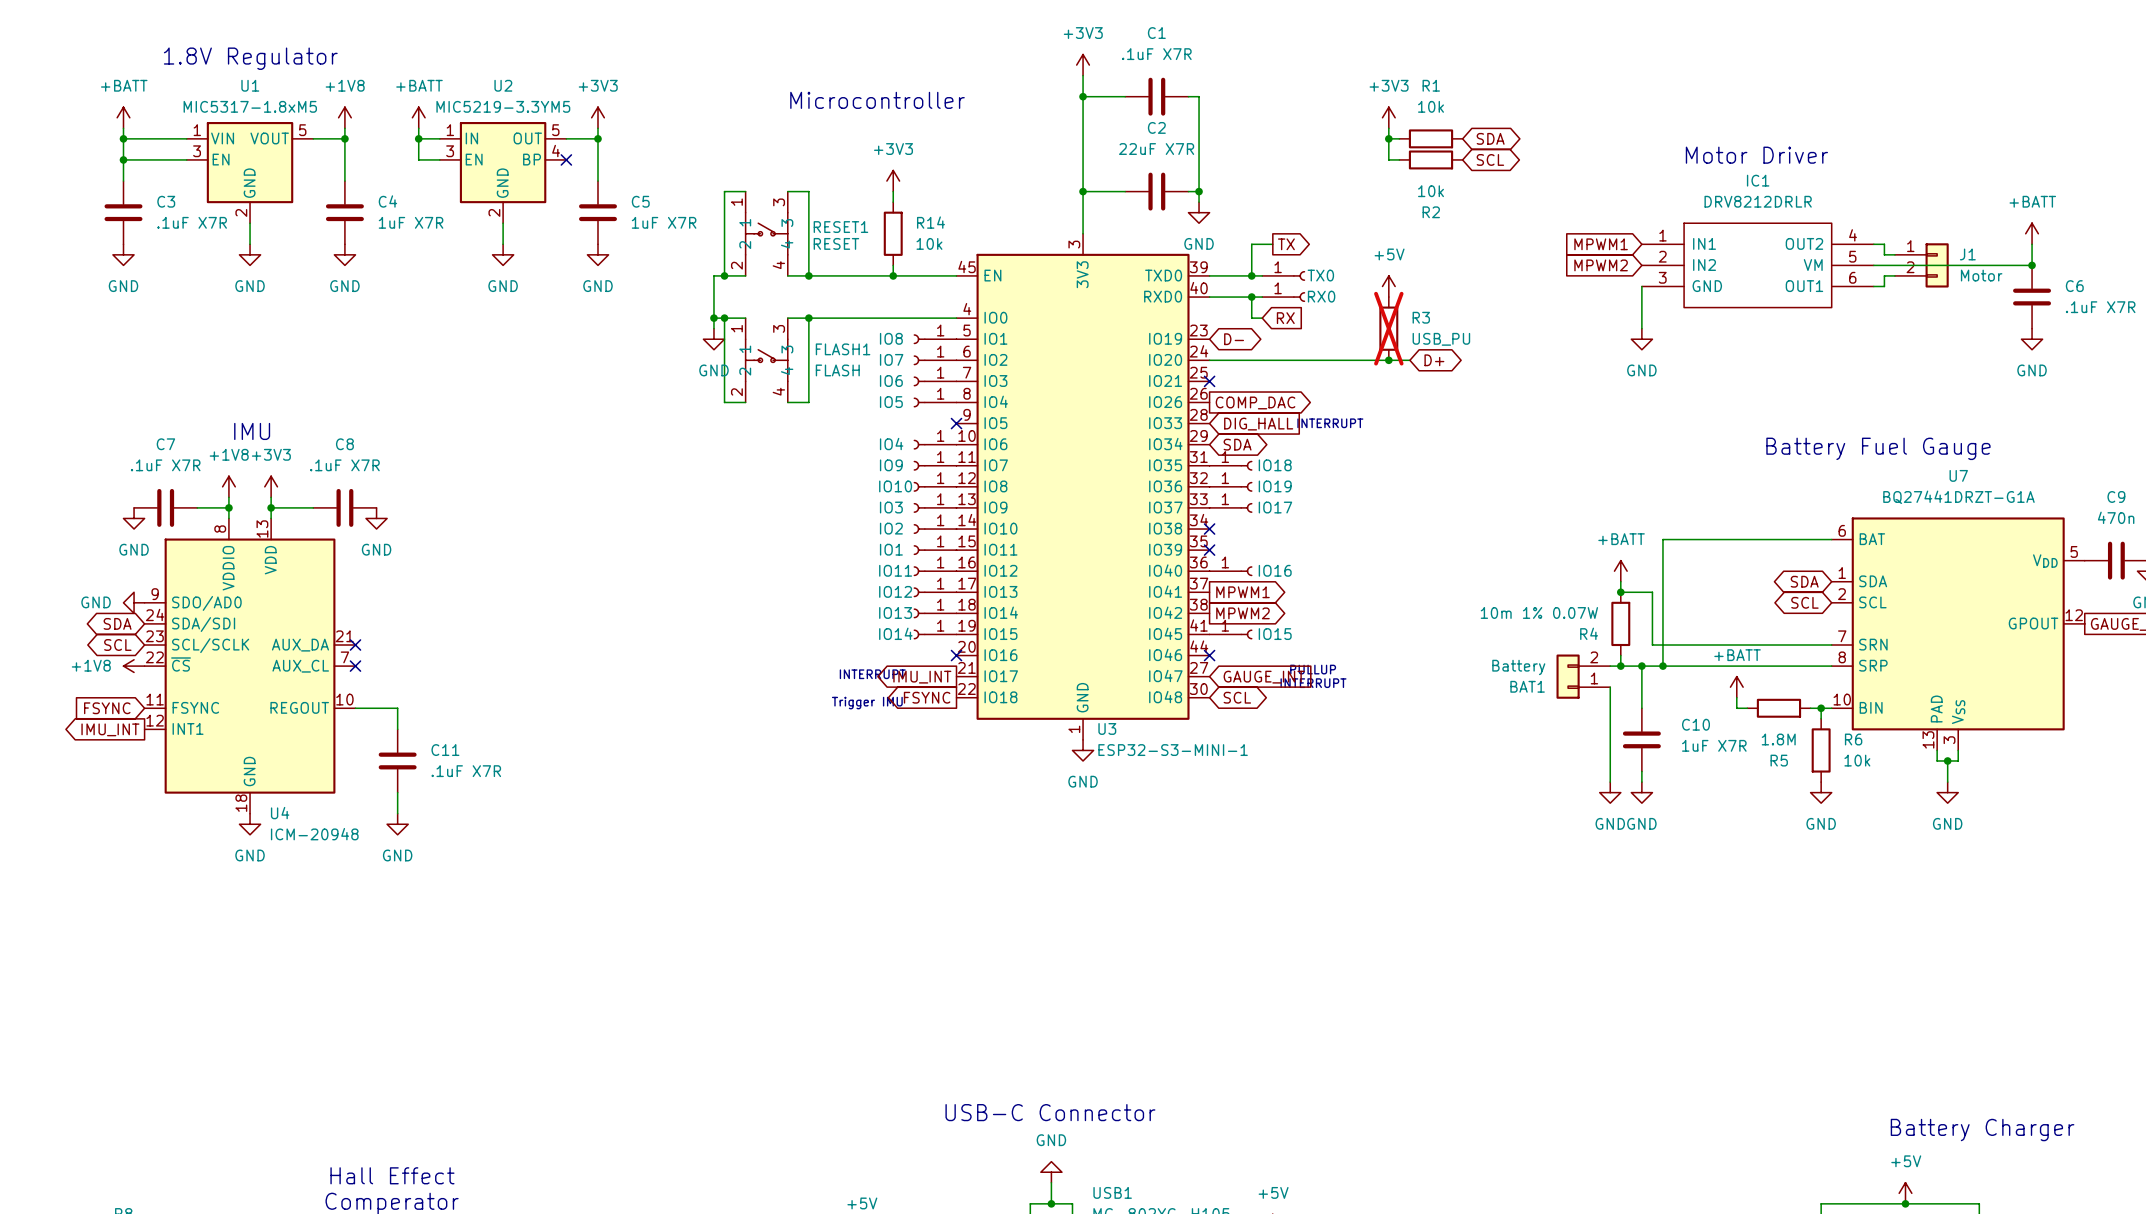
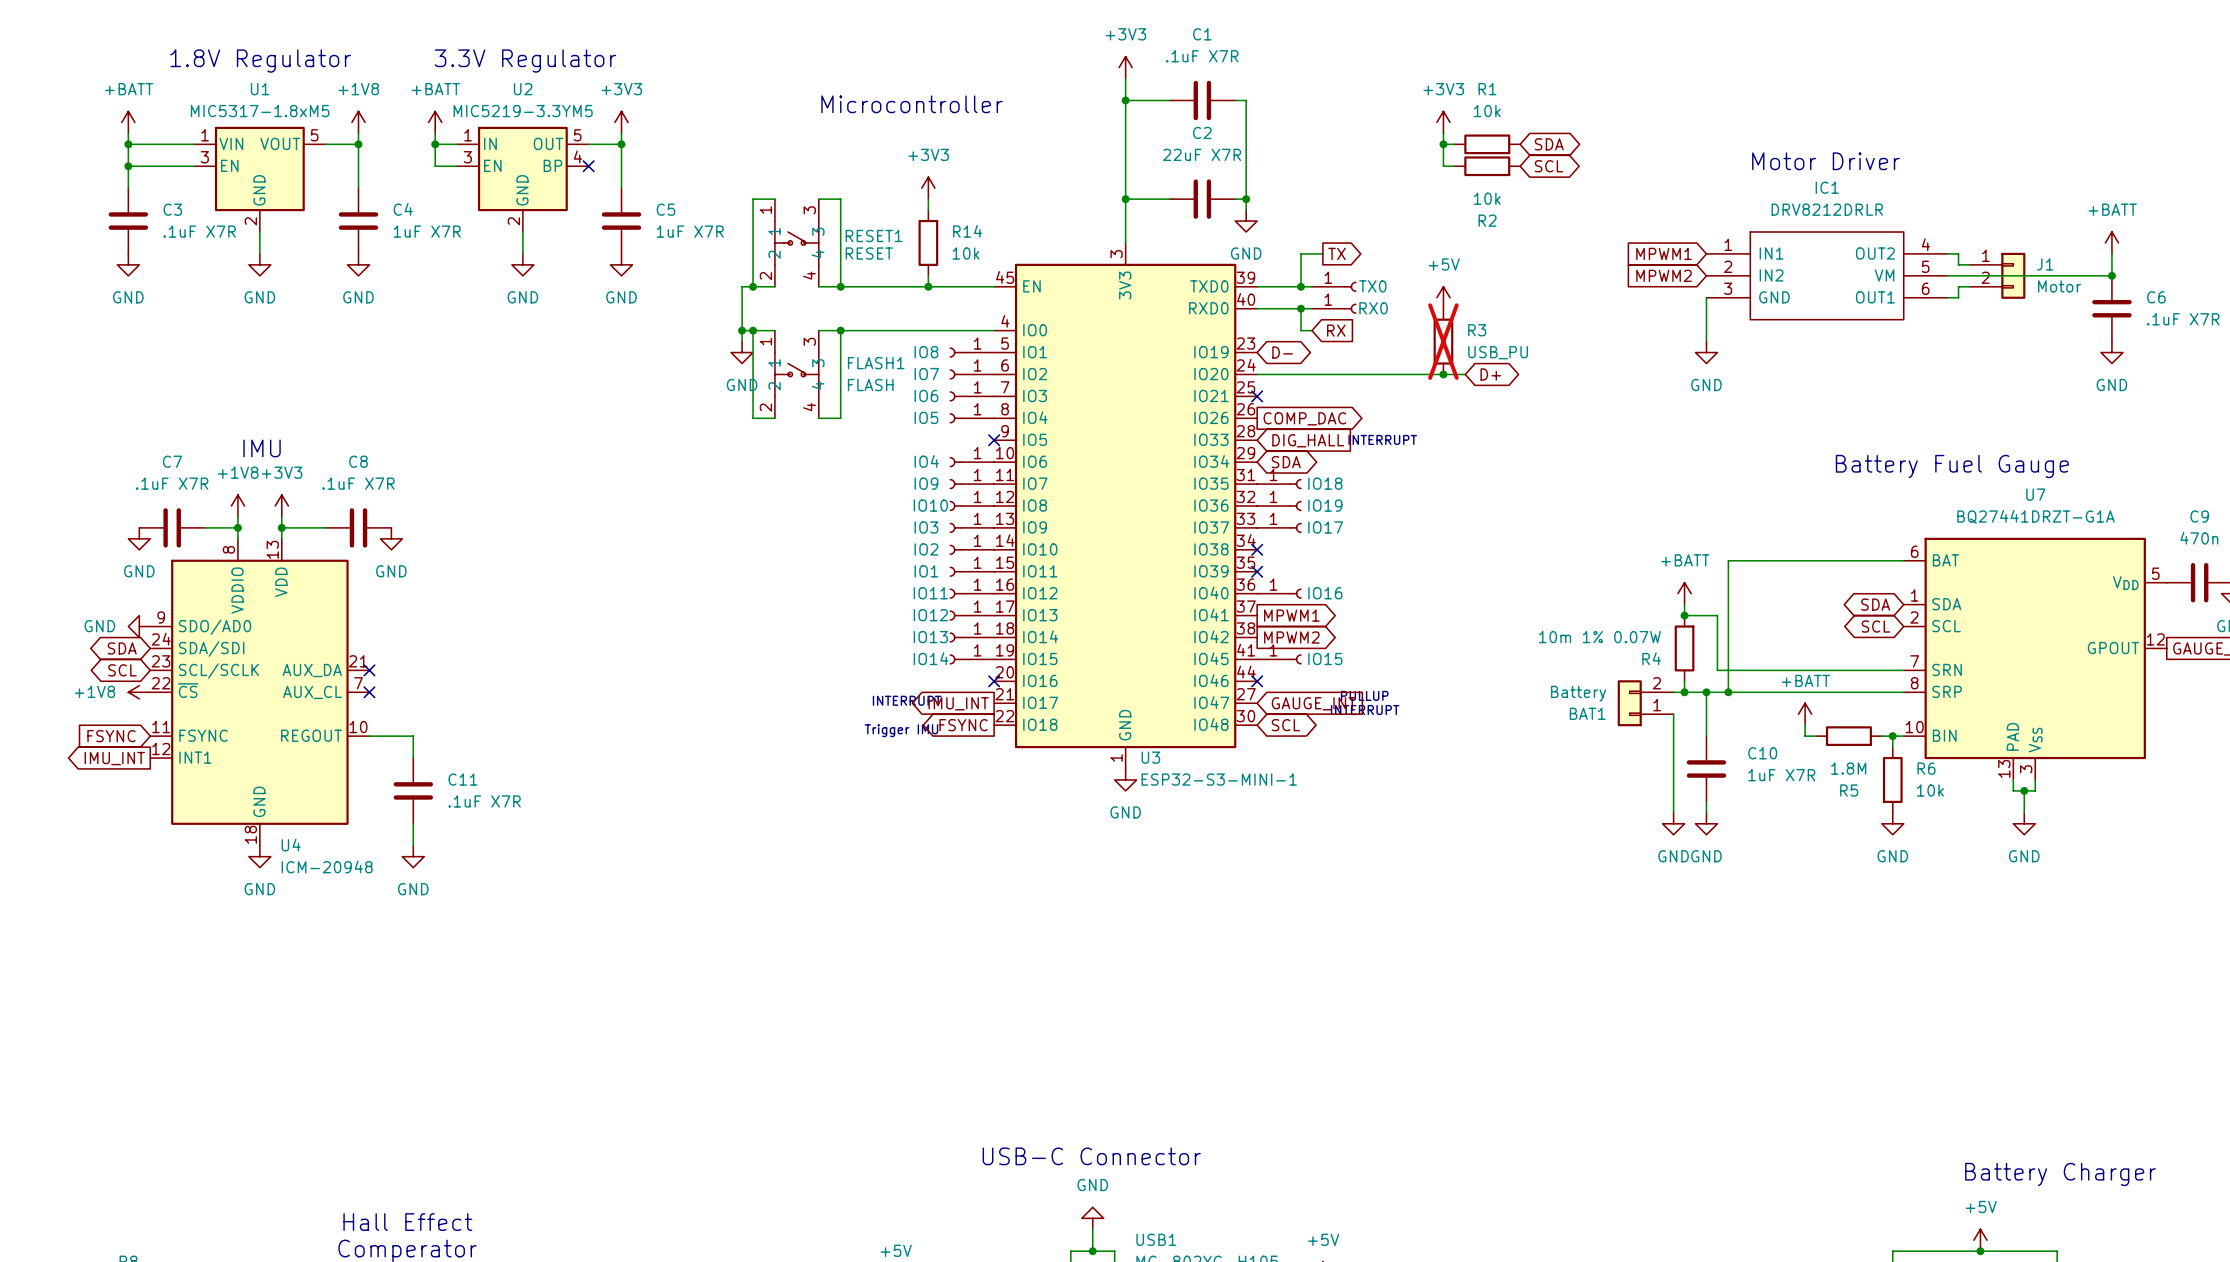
text: none -> 3.3V Regulator (525, 61)

